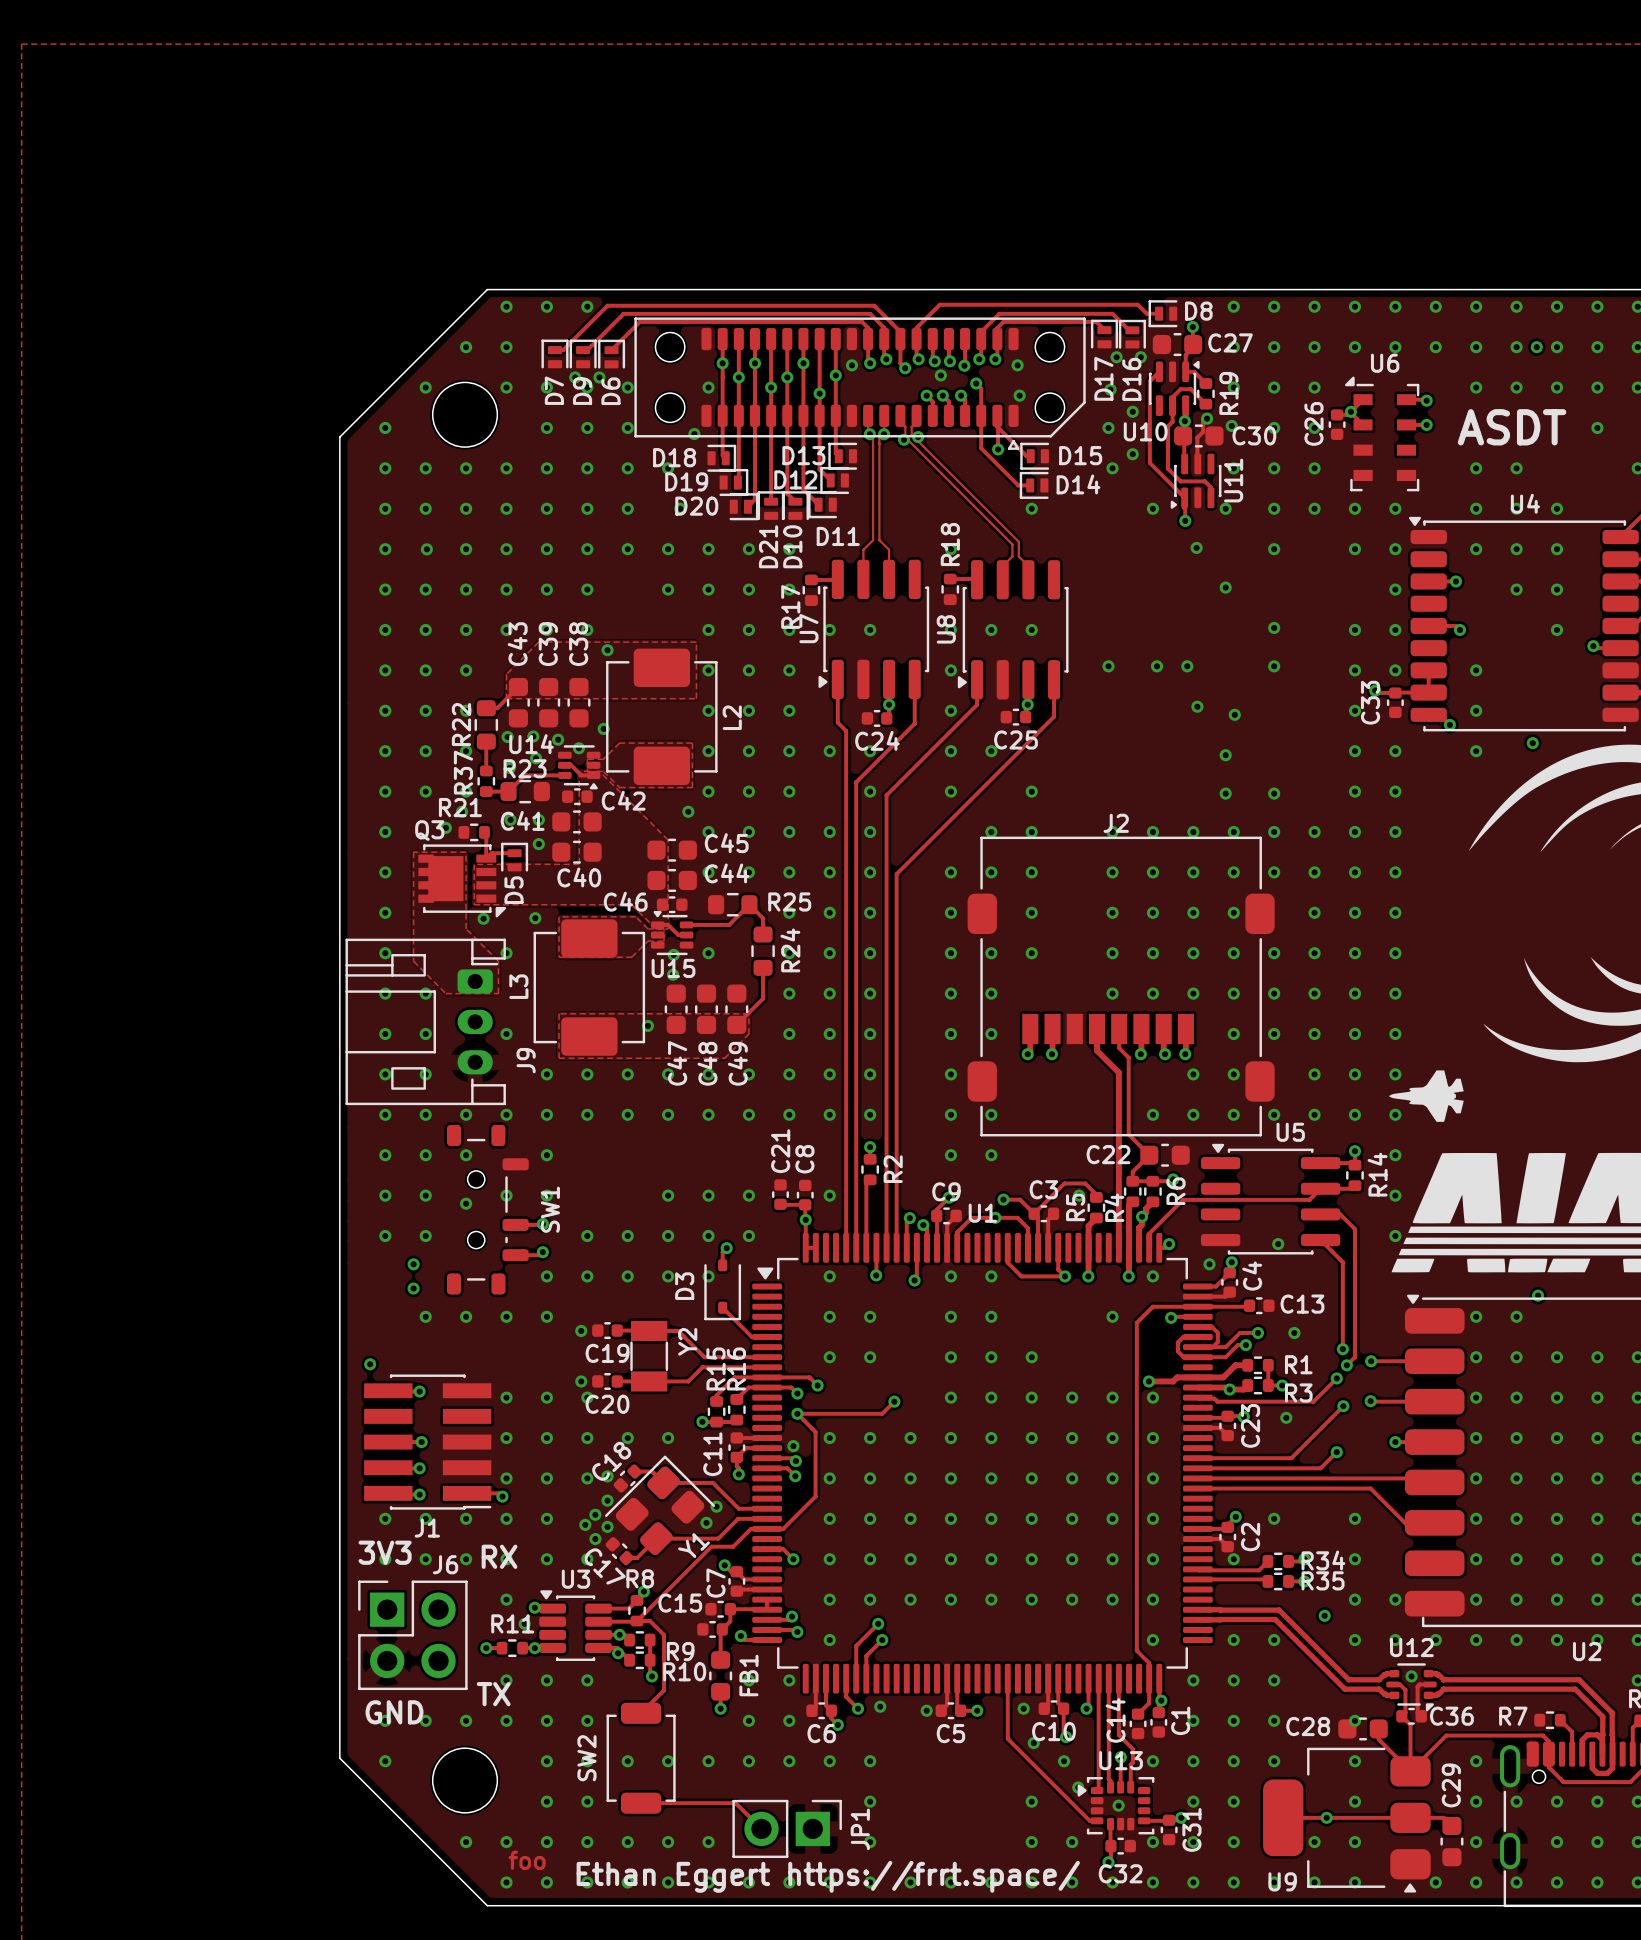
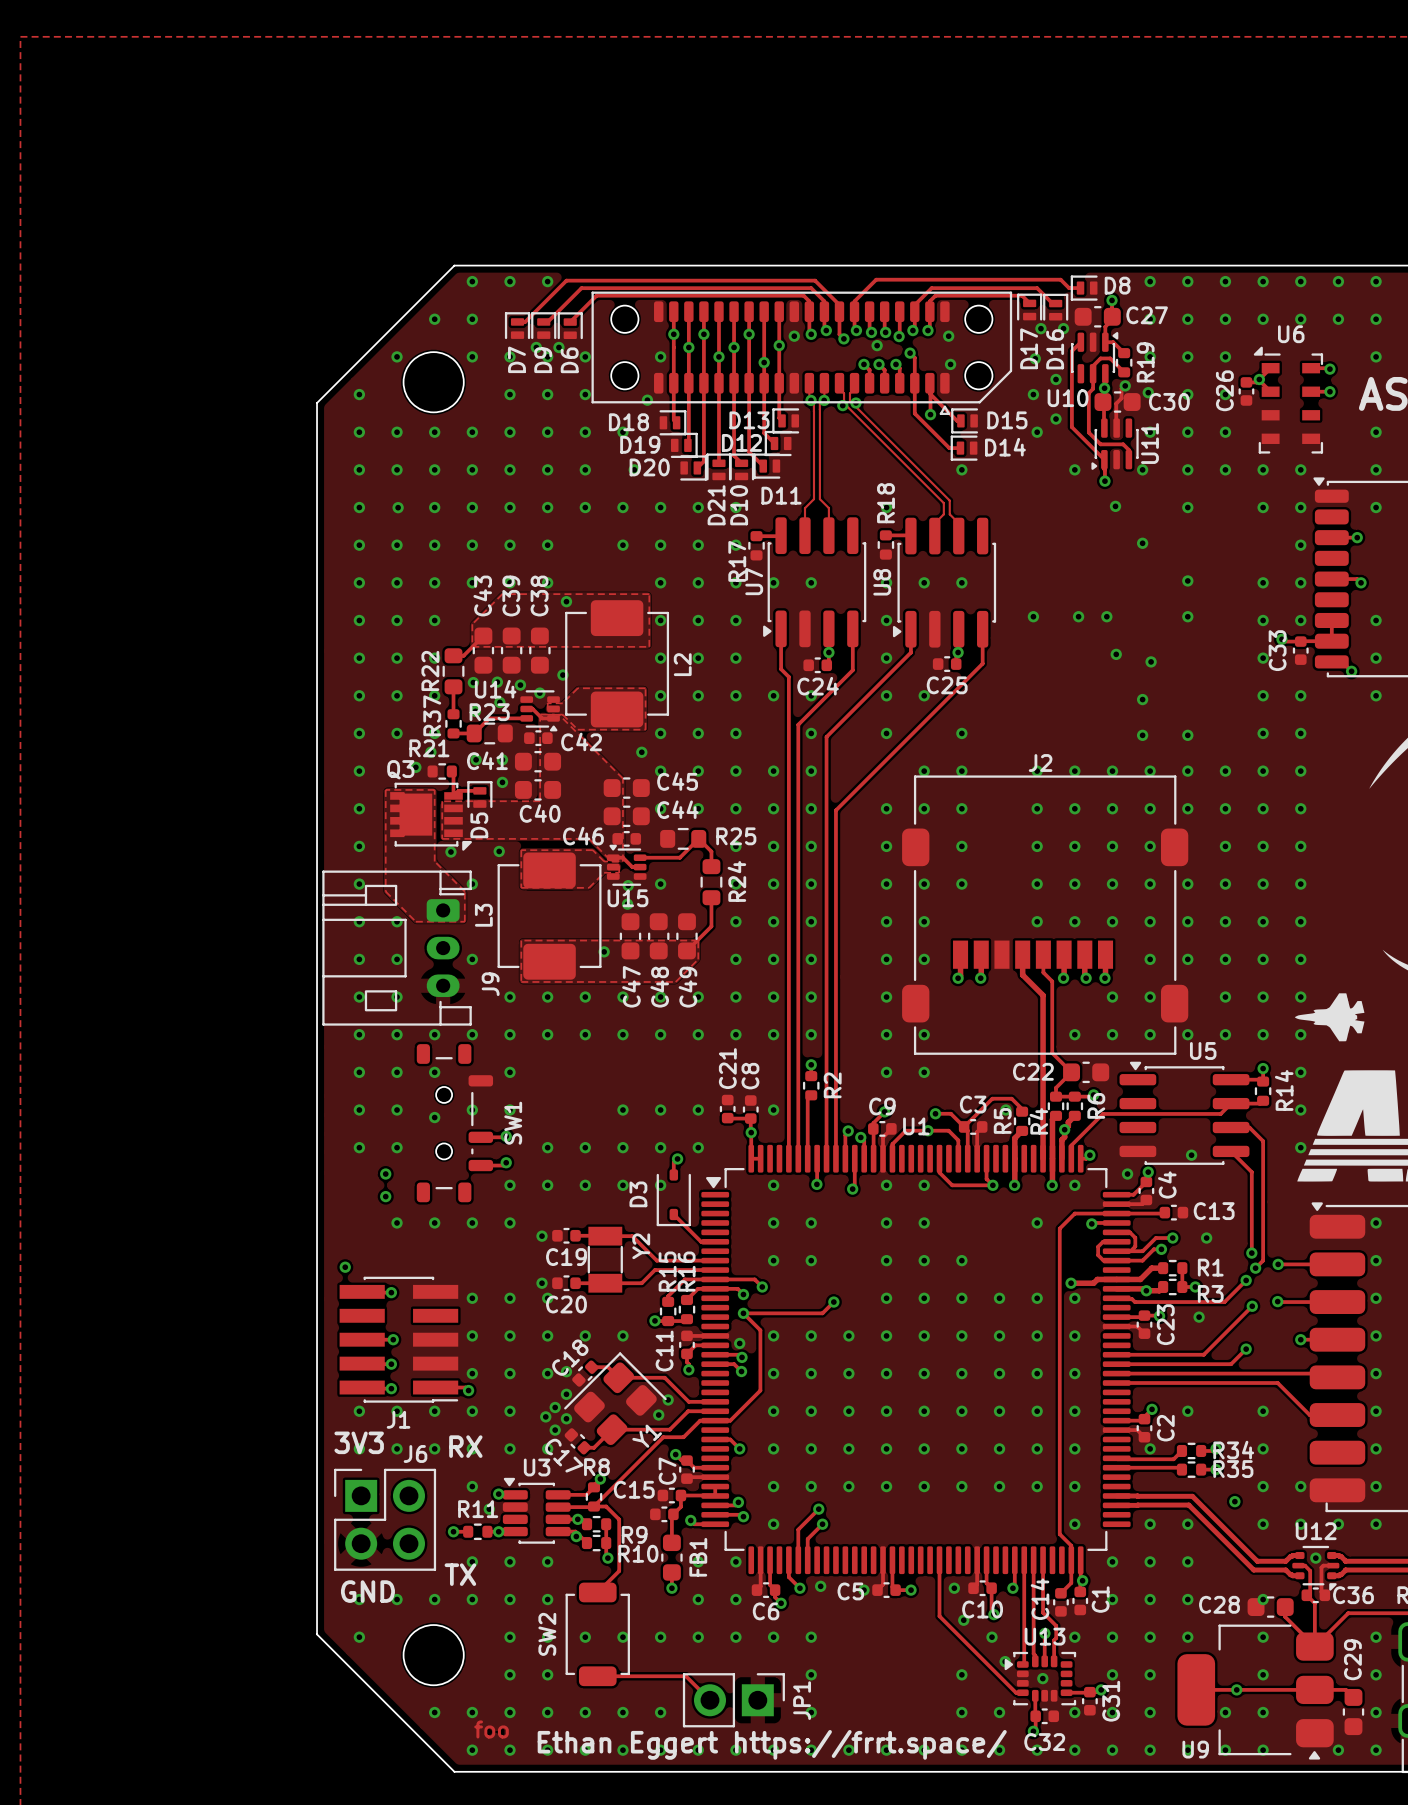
C5 name position: C5 (950, 1733) -> C5 (850, 1591)

